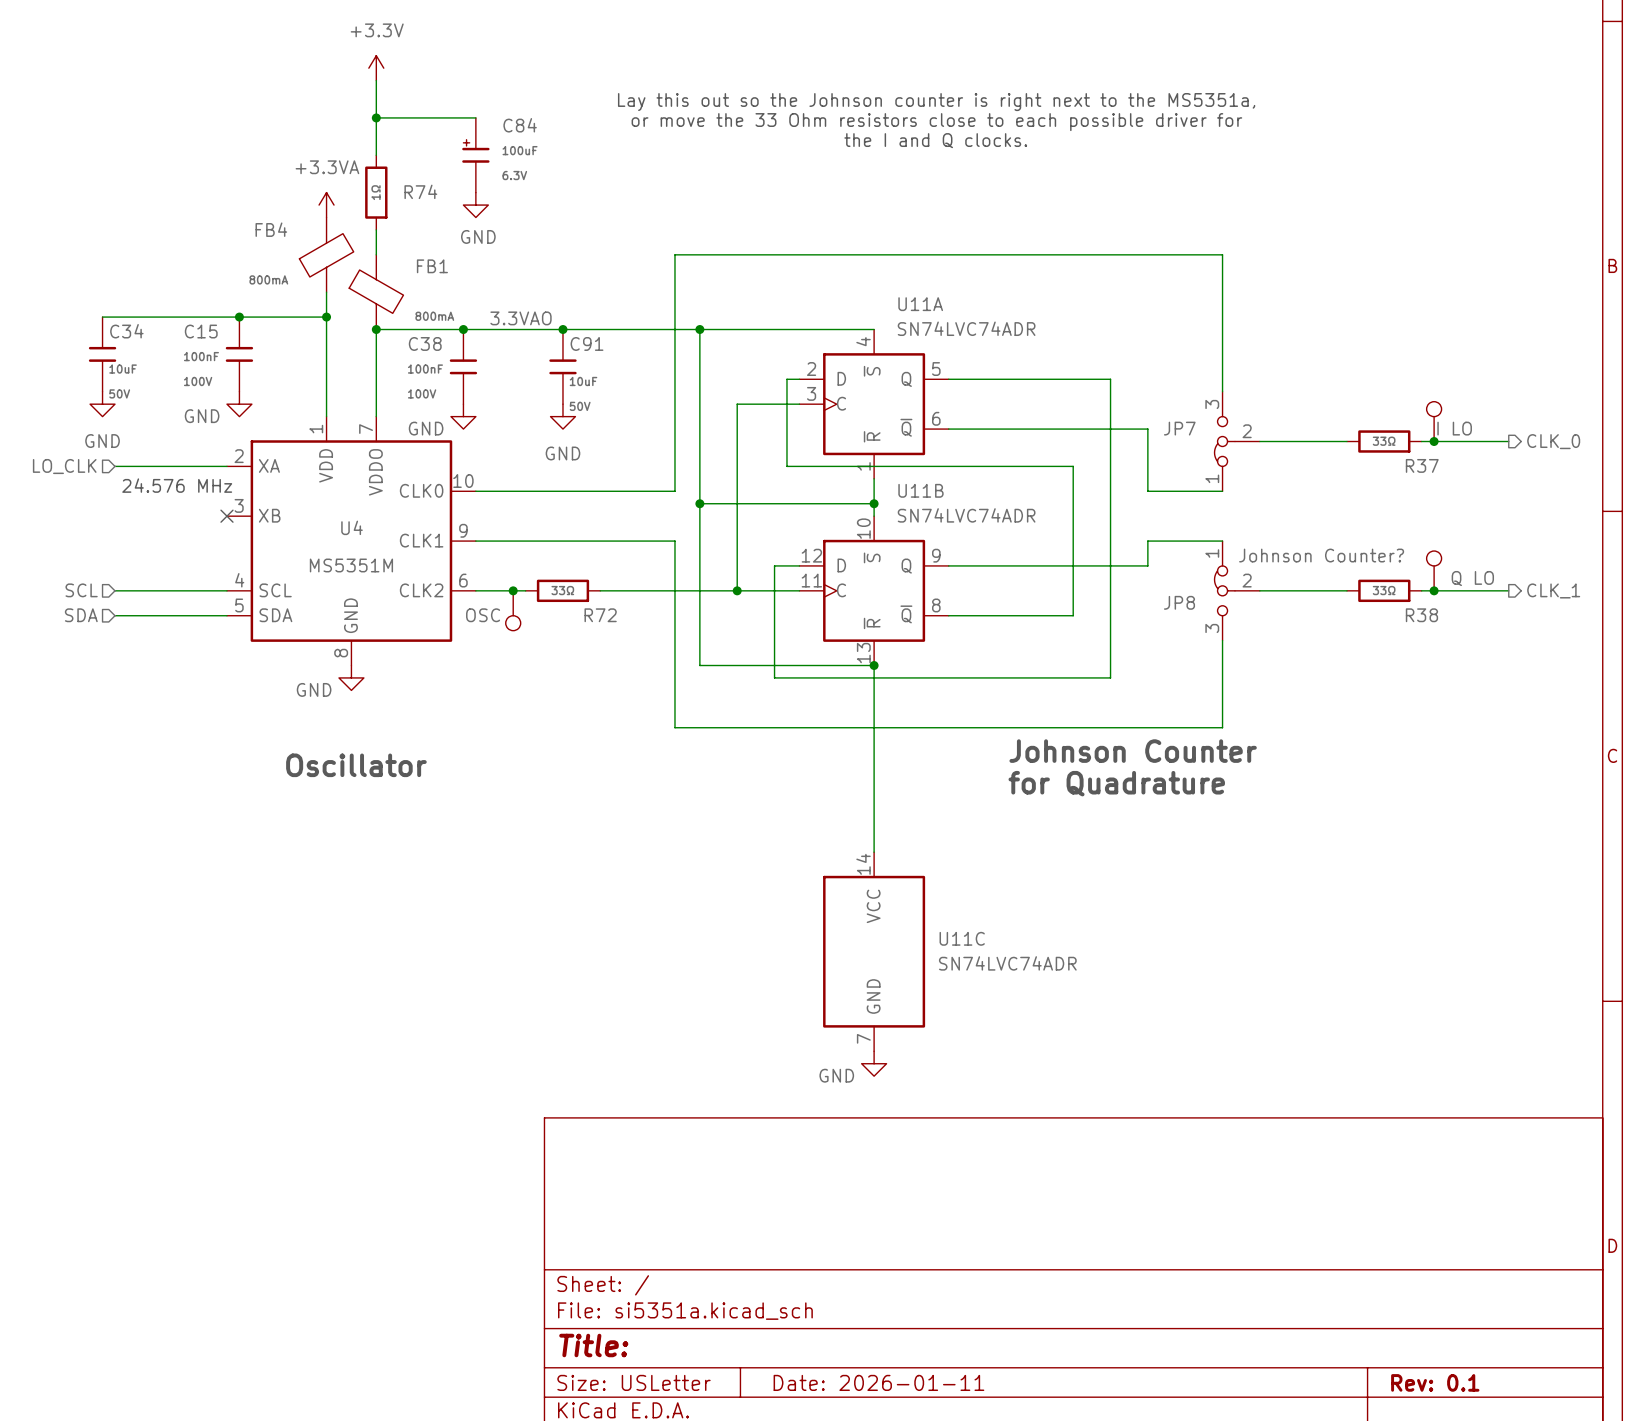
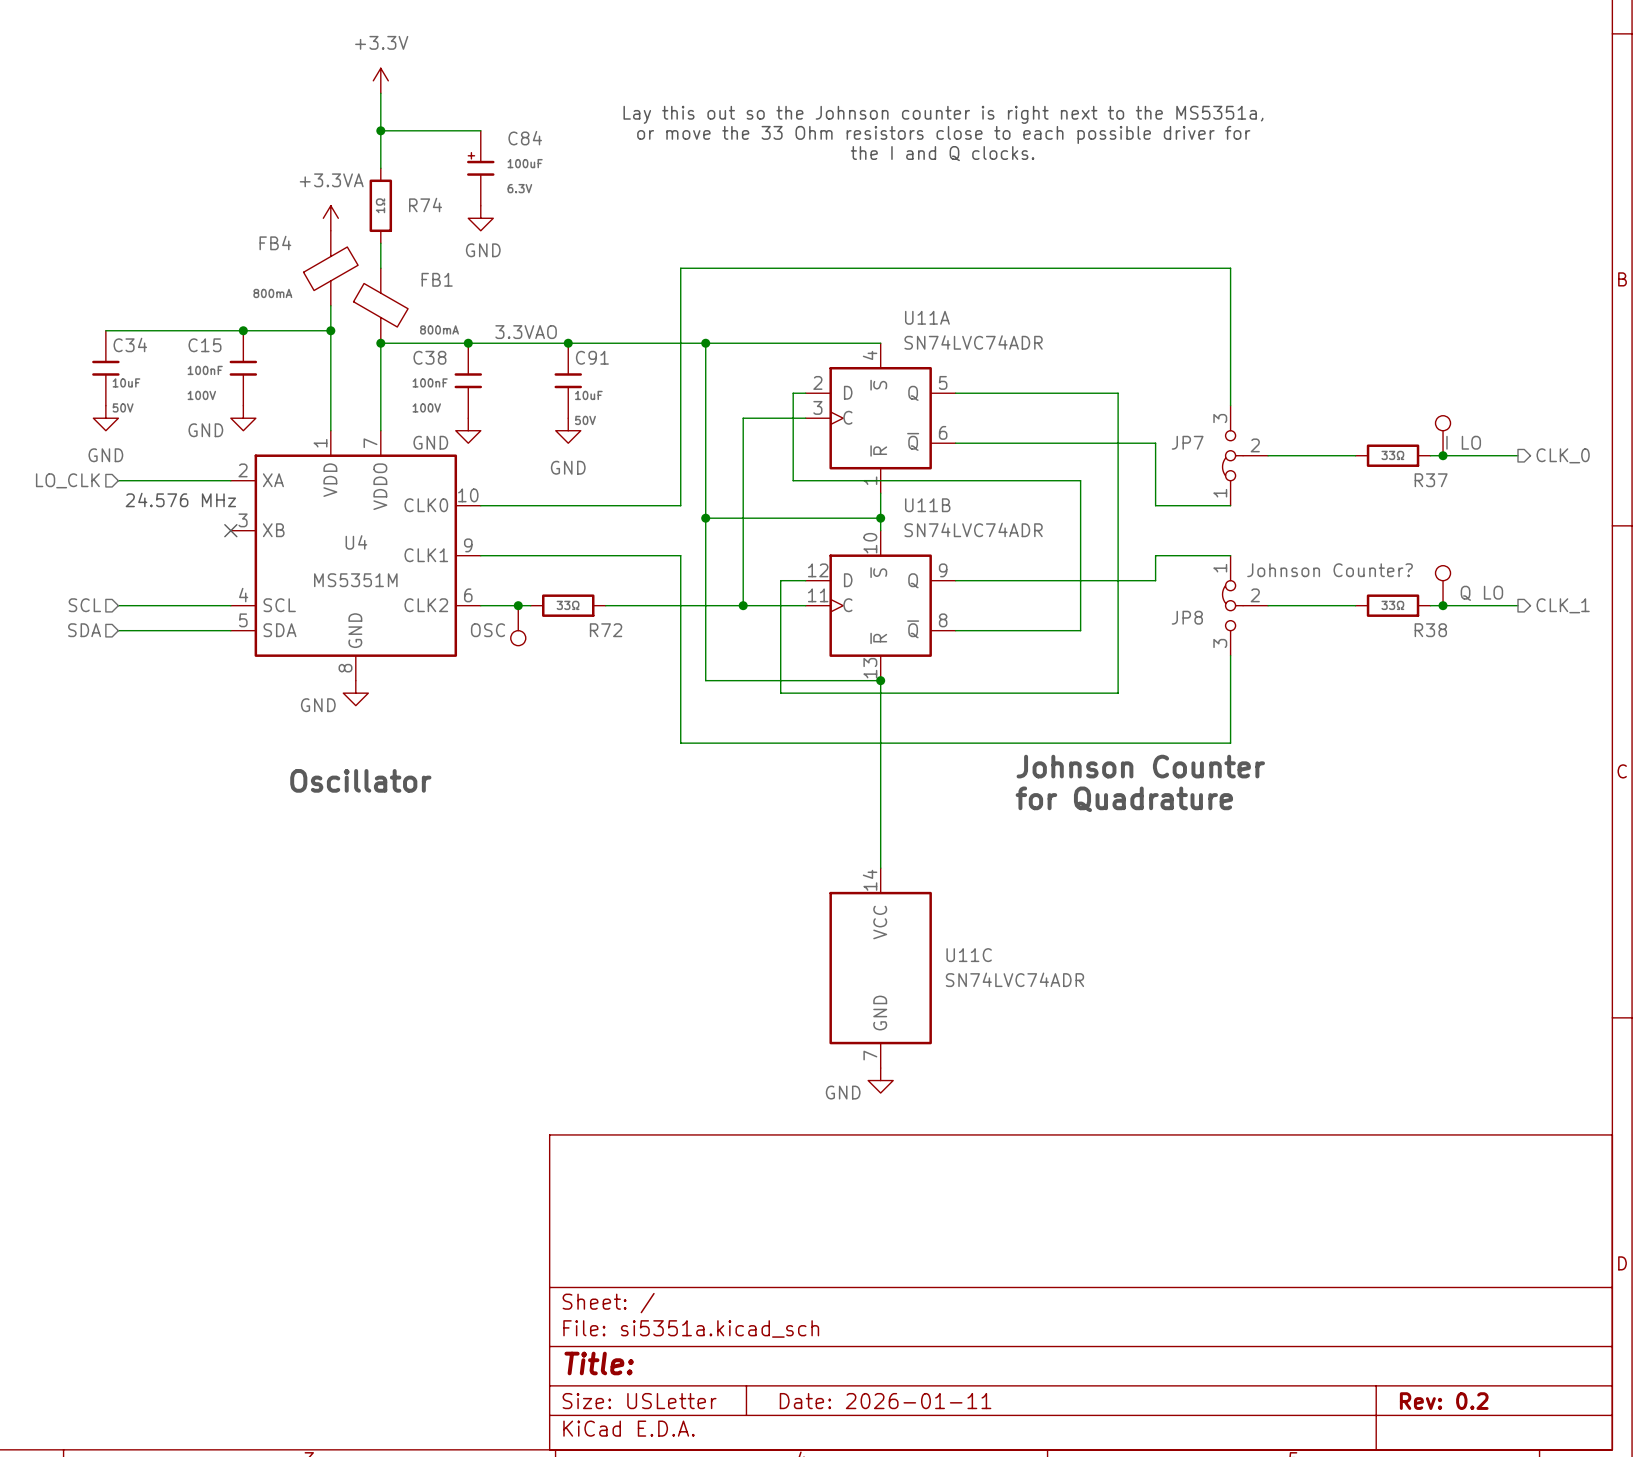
title block: Rev: 0.1 (1435, 1382) -> Rev: 0.2 (1444, 1401)

